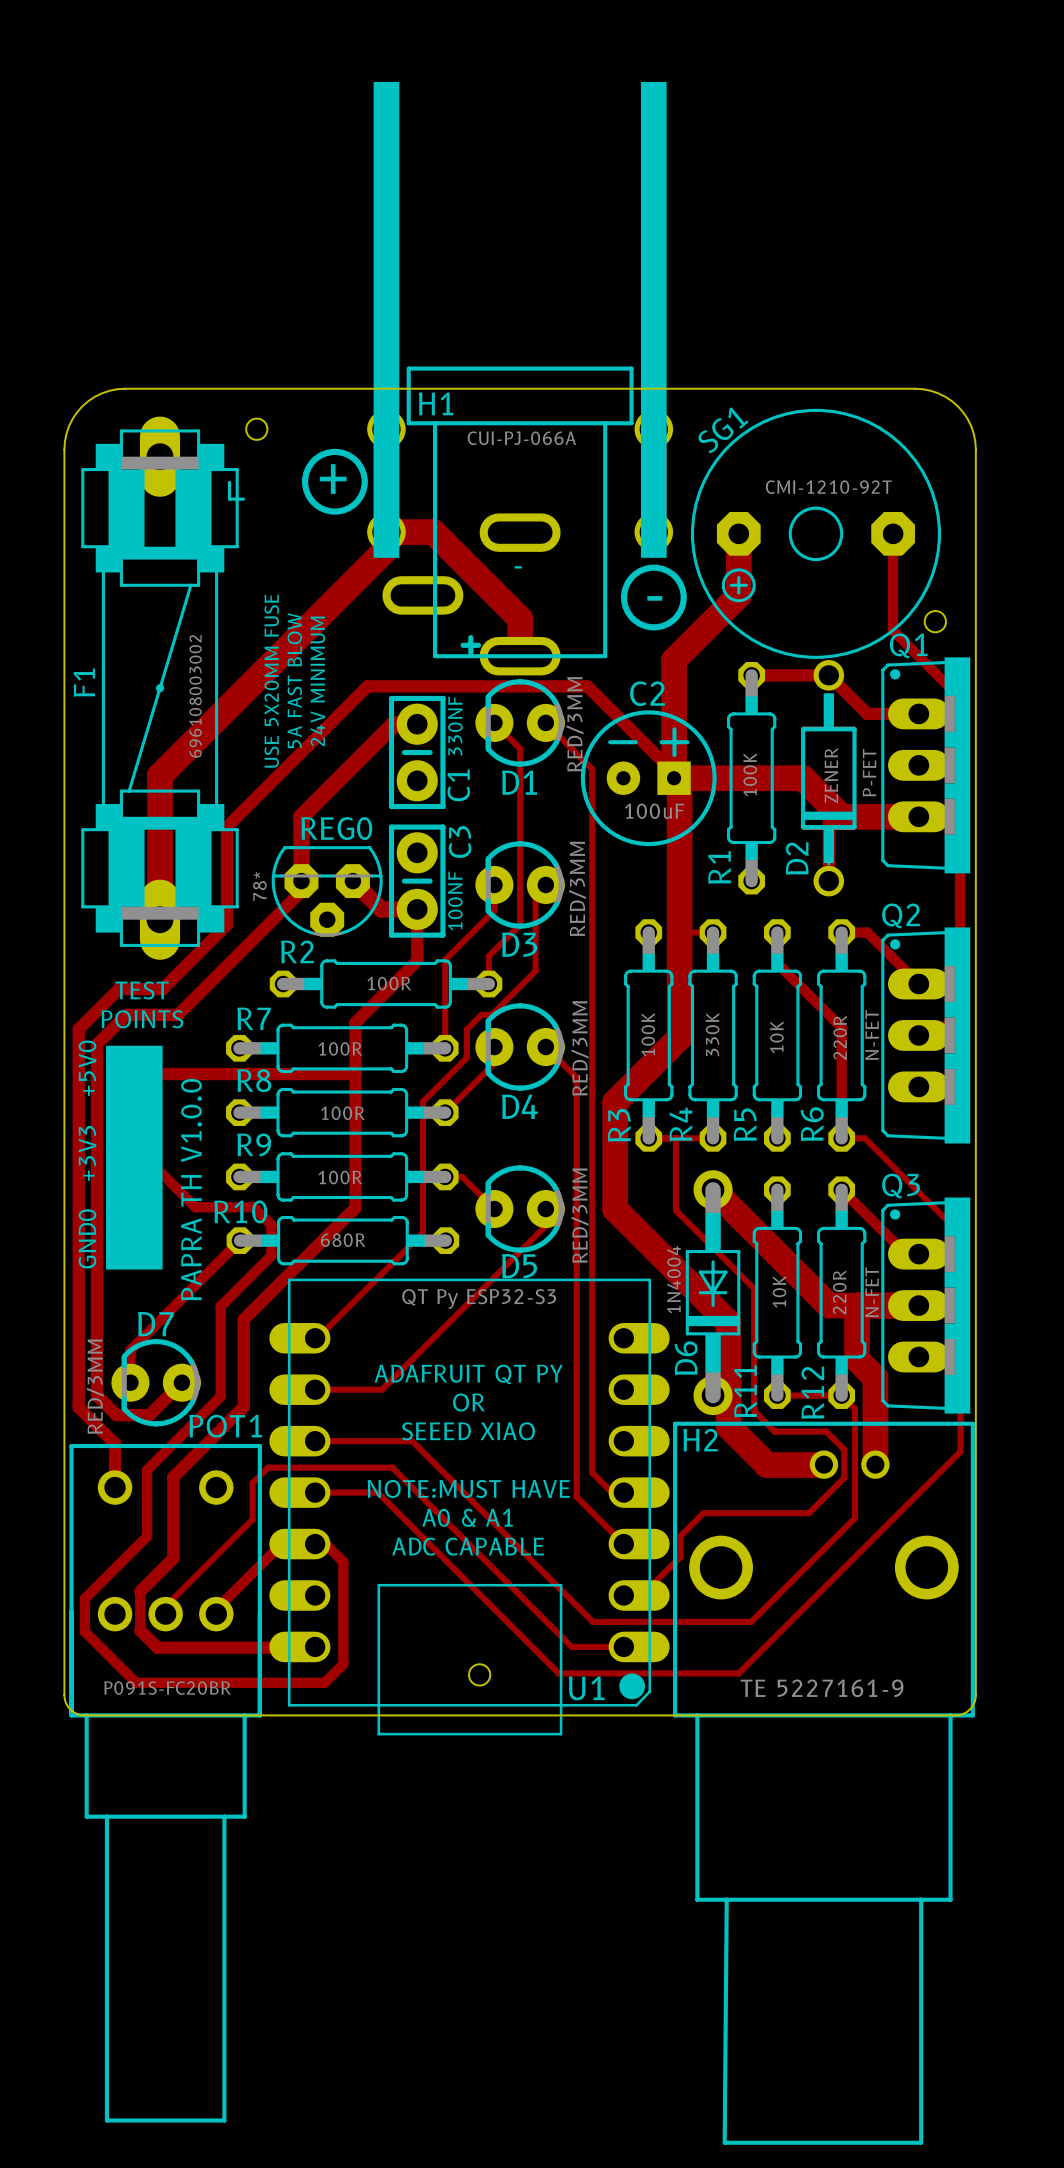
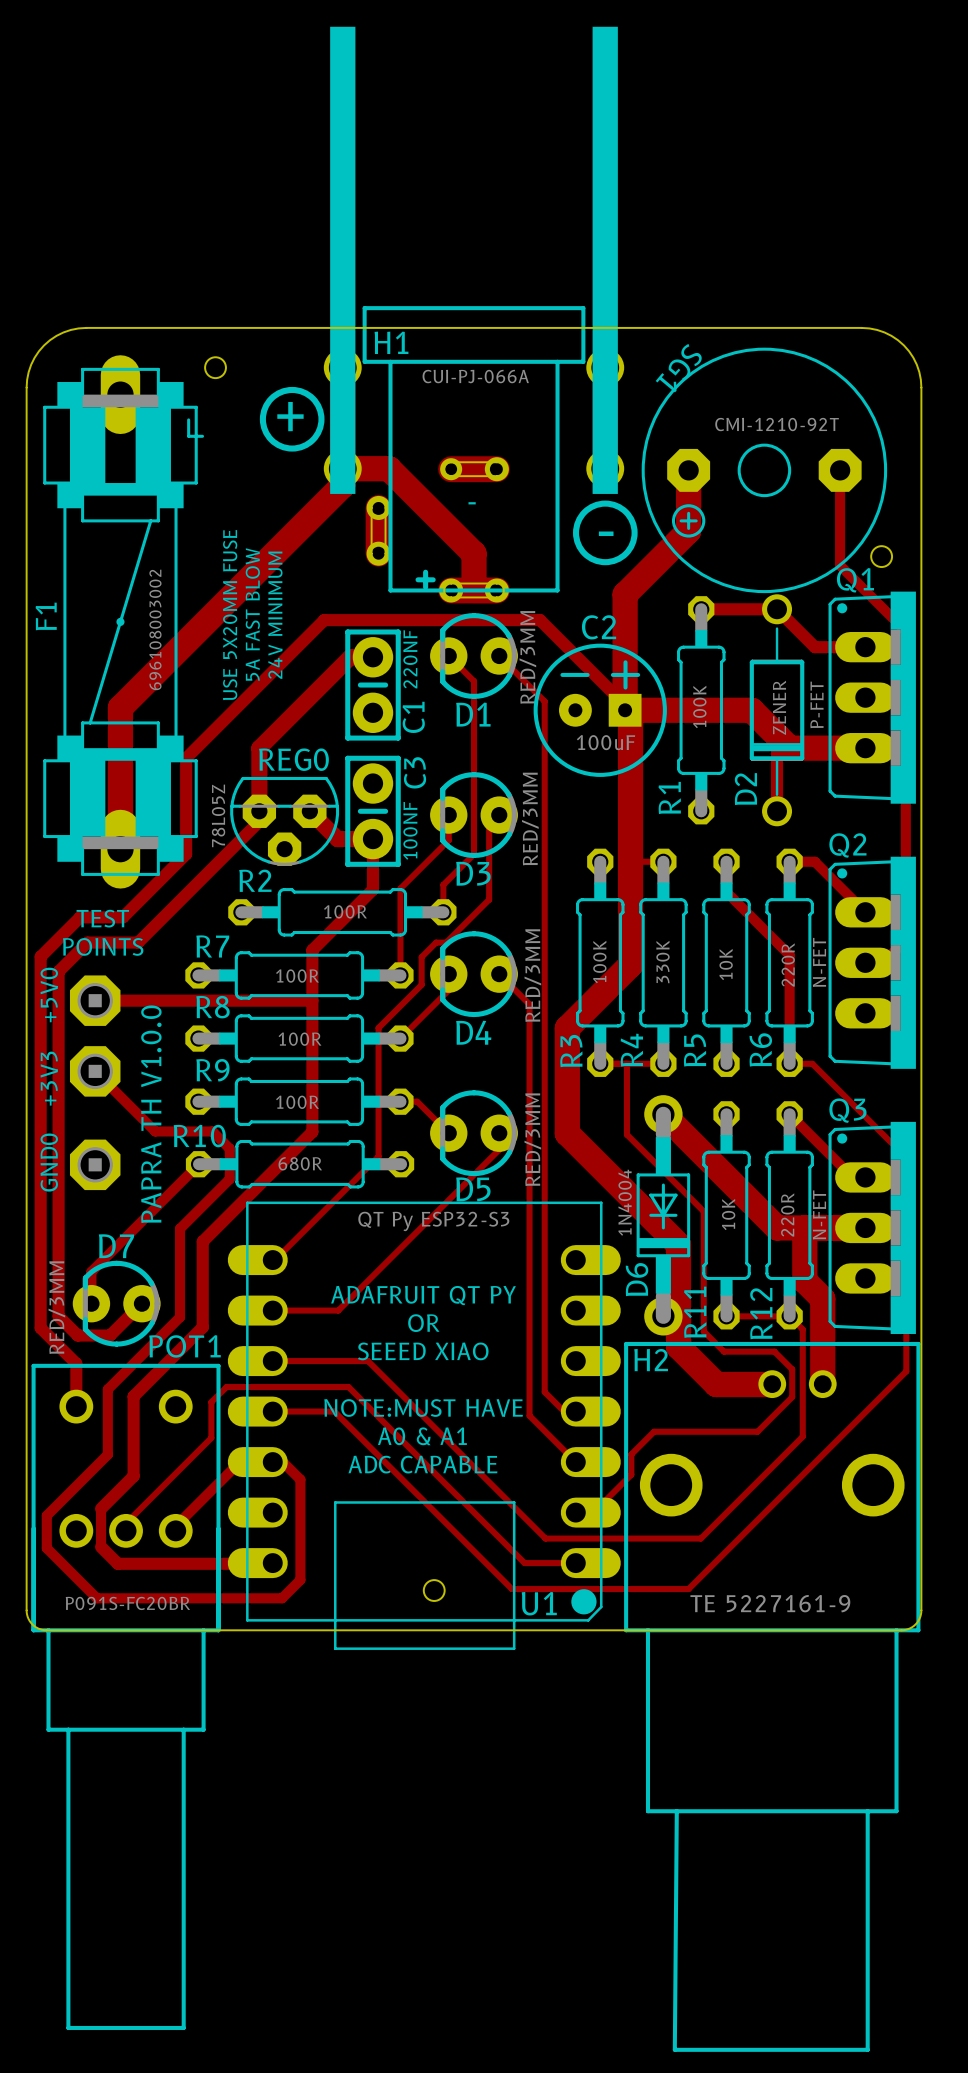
H1 footprint: [382, 366, 634, 676] -> [362, 306, 586, 604]
SG1 name rotation: 0° (723, 430) -> 170° clockwise (678, 368)
drawing: [823, 693, 834, 730] -> none
text: 330NF (455, 726) -> 220NF (410, 659)
drawing: [823, 827, 834, 864] -> none
REG0 value: 78* (259, 886) -> 78L05Z (218, 815)
drawing: [105, 1045, 163, 1270] -> none

